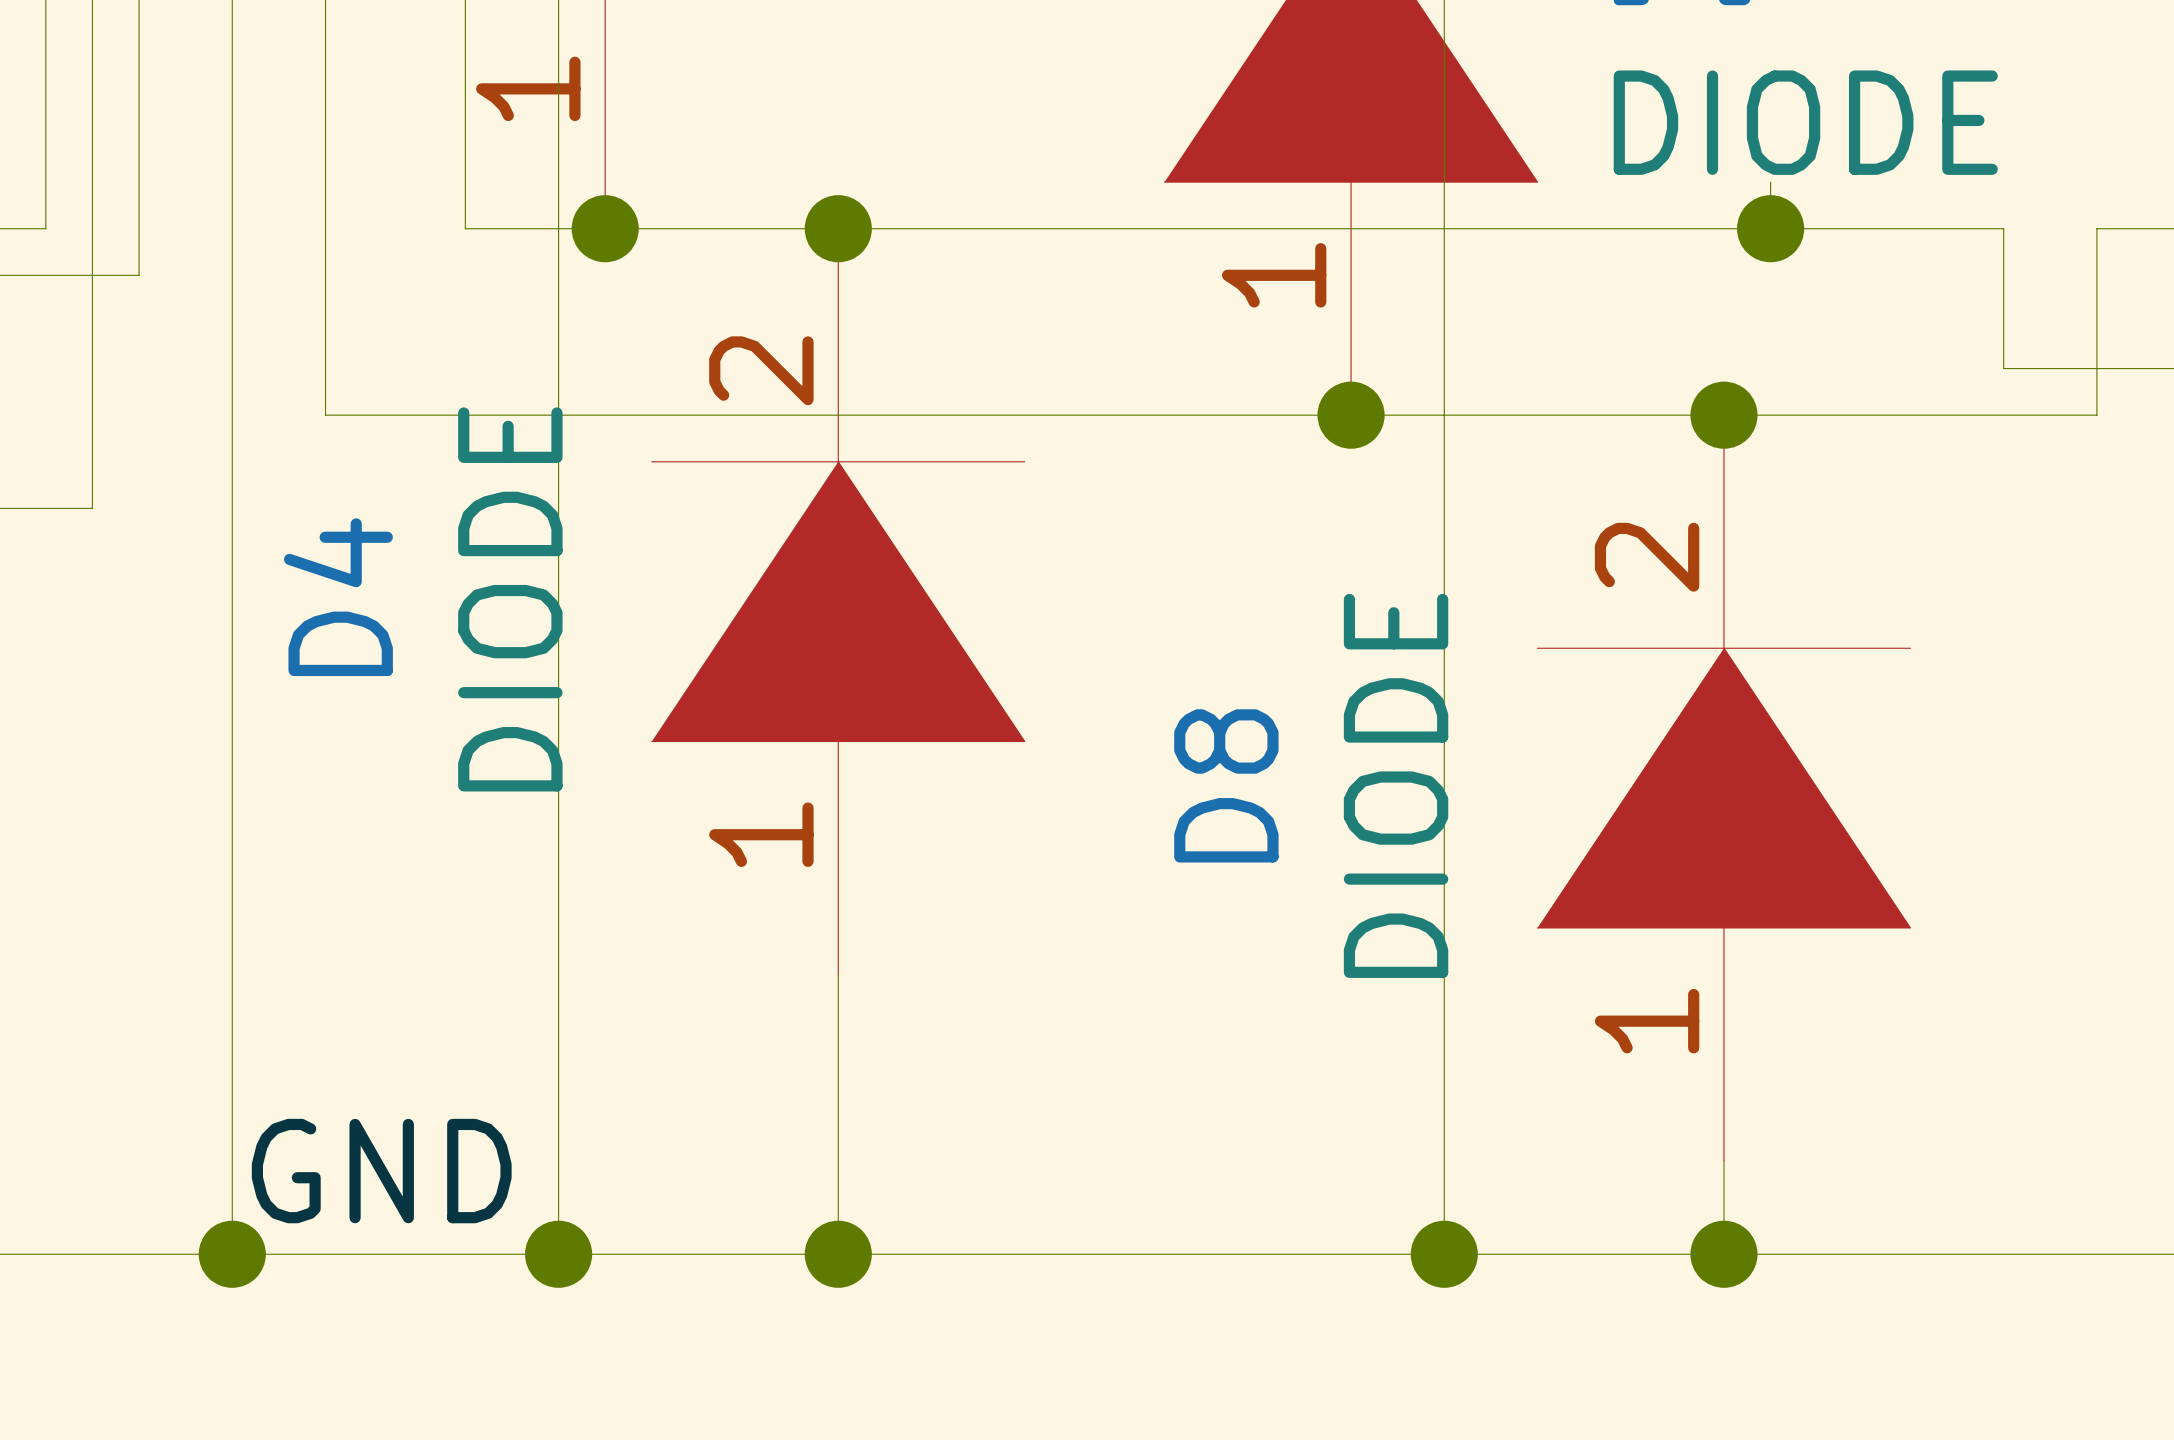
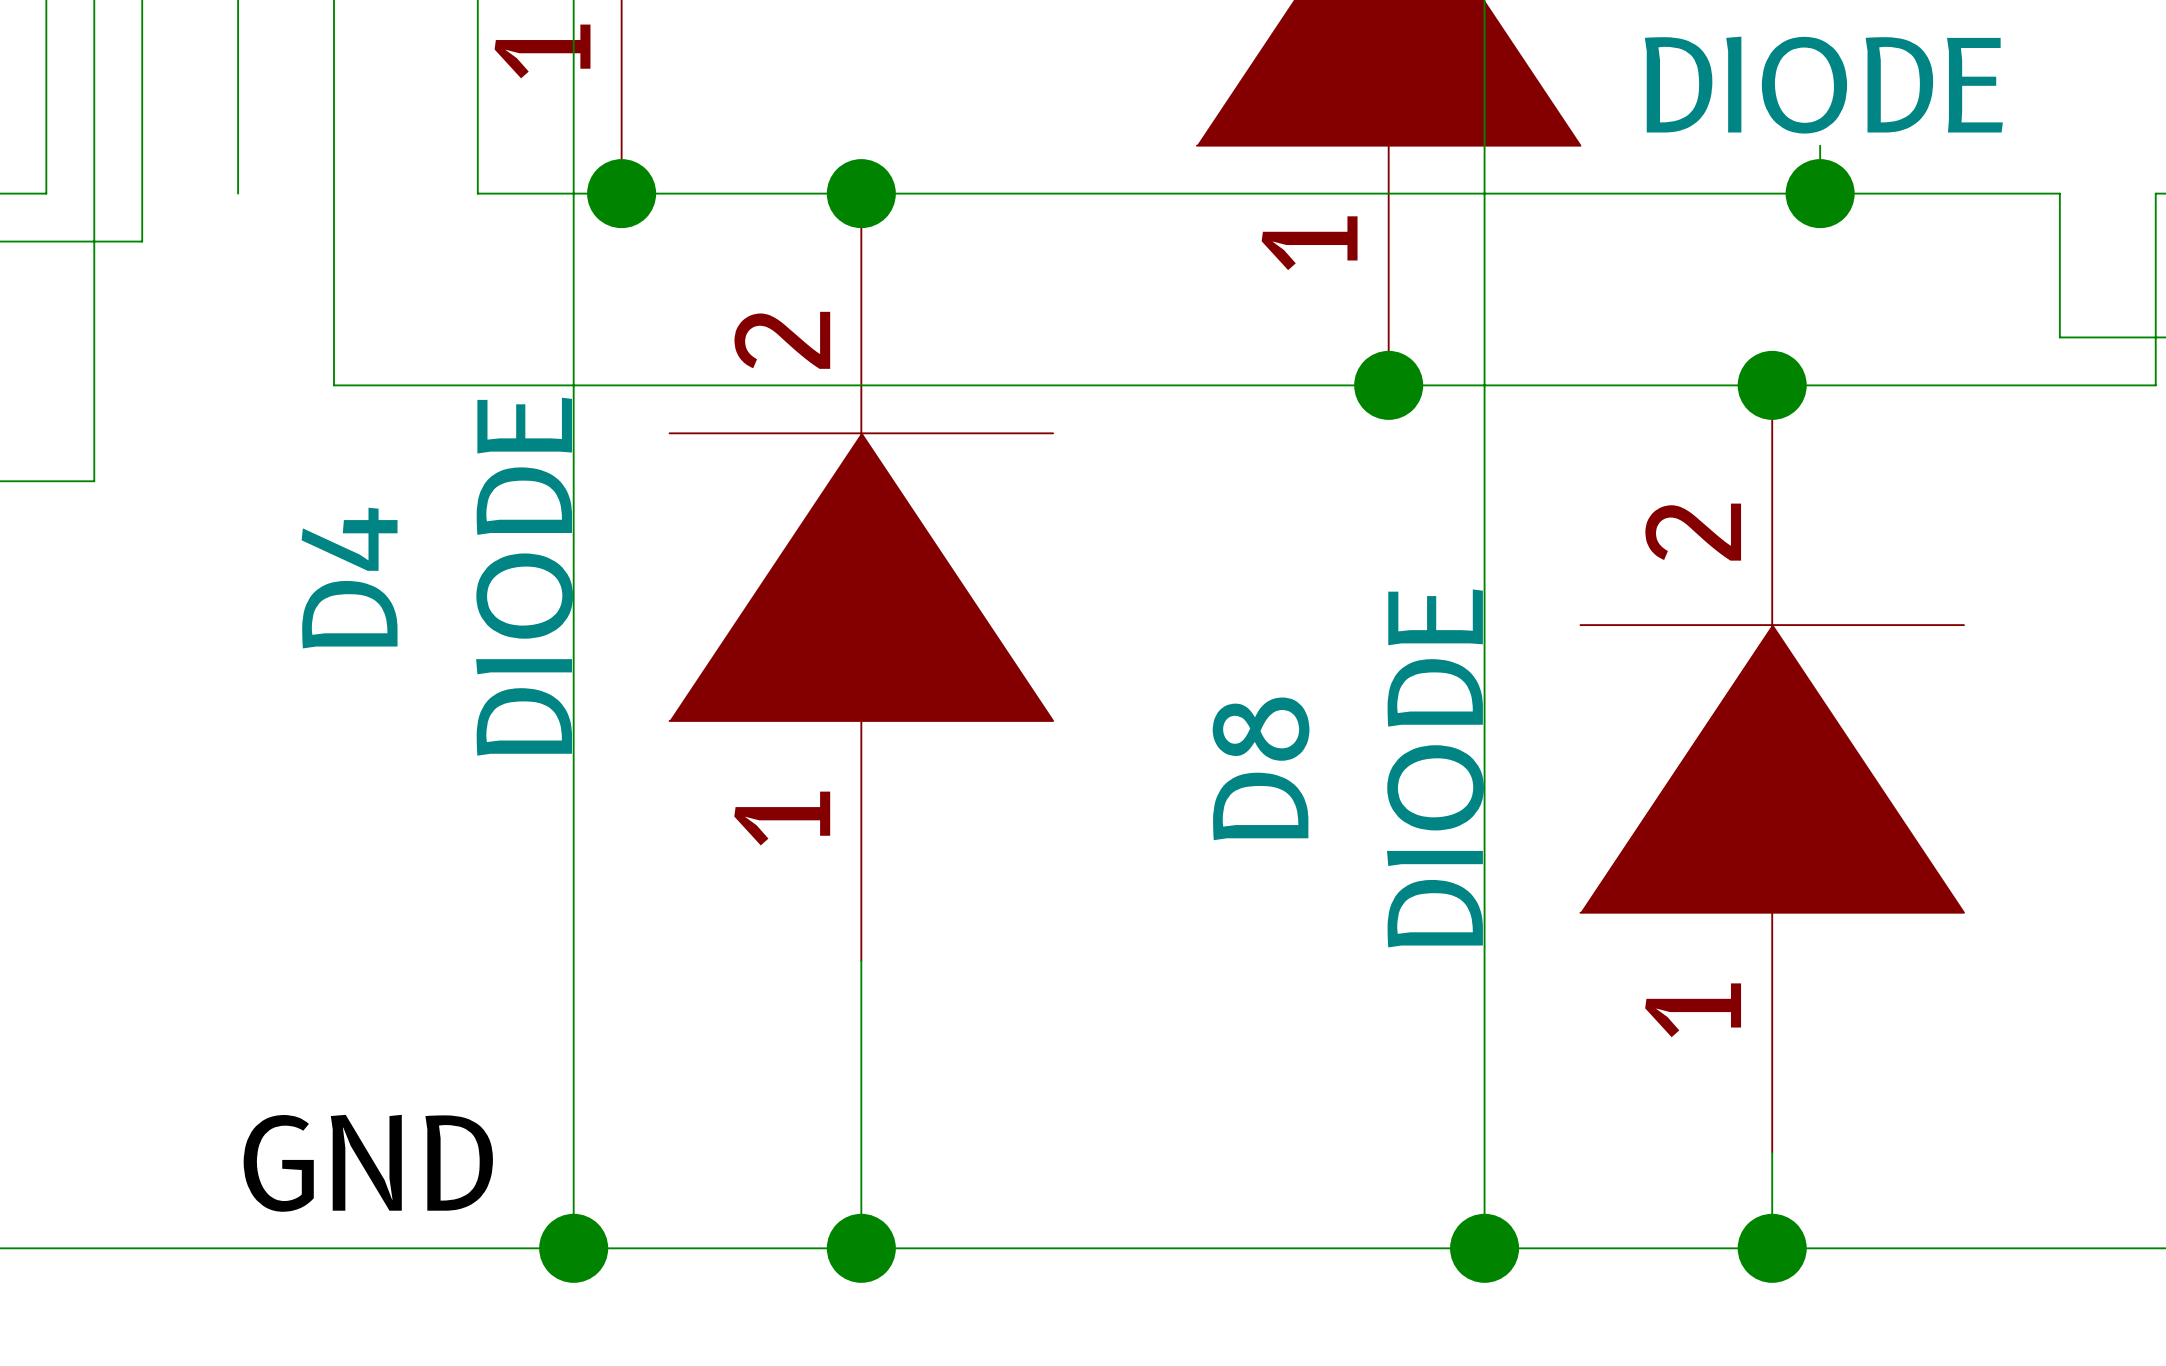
wire: (232, 228) (232, 1254) -> none
junction: (232, 1254) -> none

